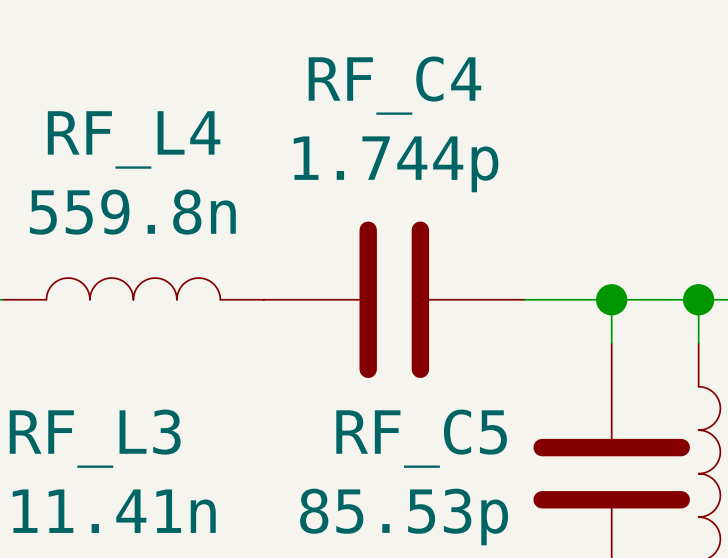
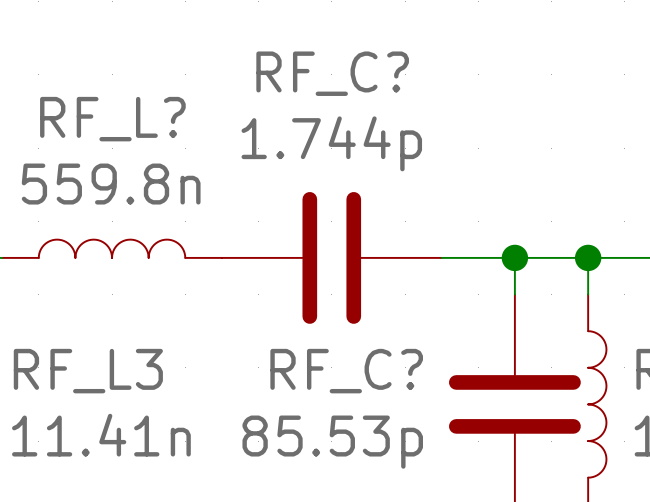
RF_C4 name: RF_C4 (394, 85) -> RF_C? (332, 73)
RF_L4 name: RF_L4 (134, 139) -> RF_L? (112, 119)
RF_C5 name: RF_C5 (421, 438) -> RF_C? (346, 371)

